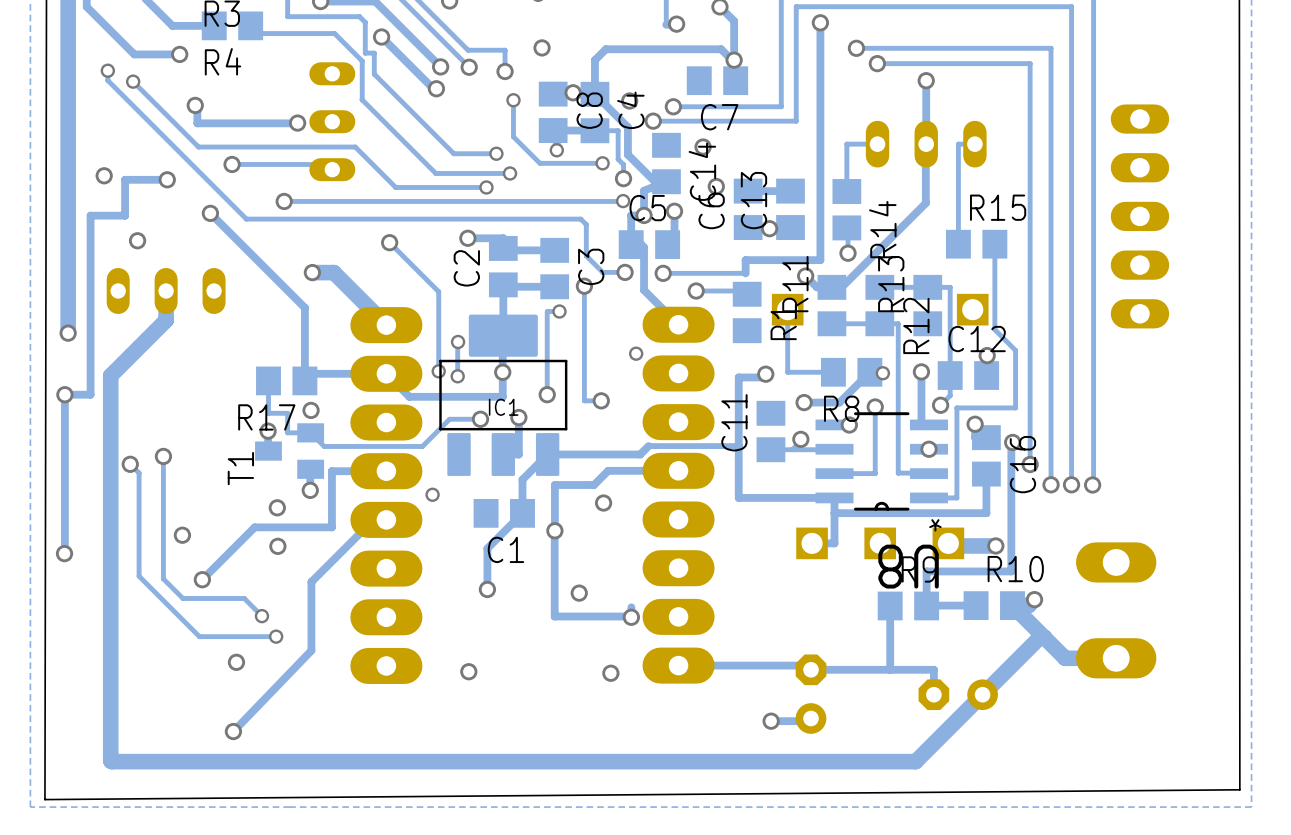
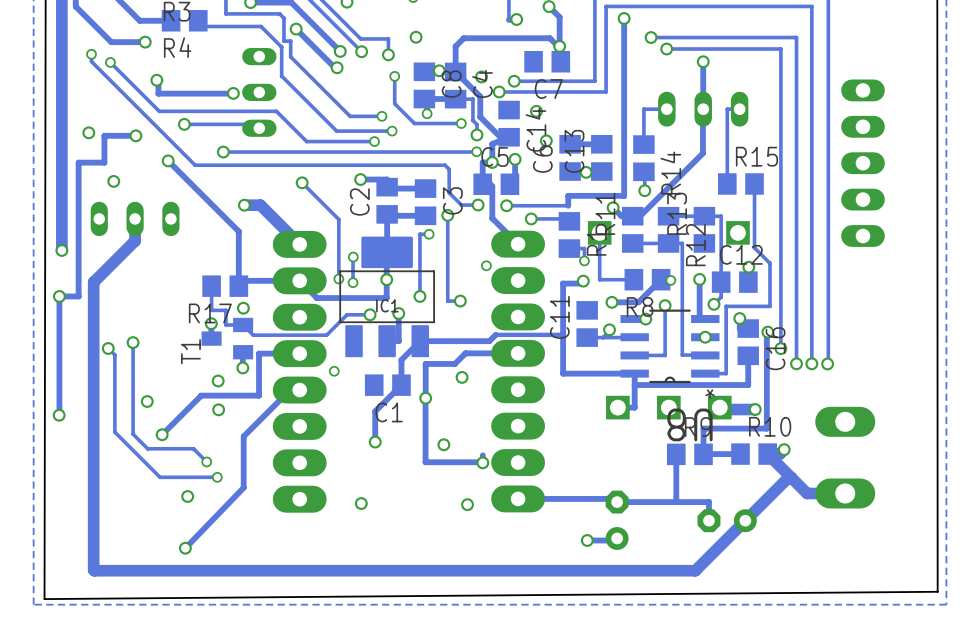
track: none -> (569, 248) (584, 248) (584, 260)
via: none -> (584, 260)

